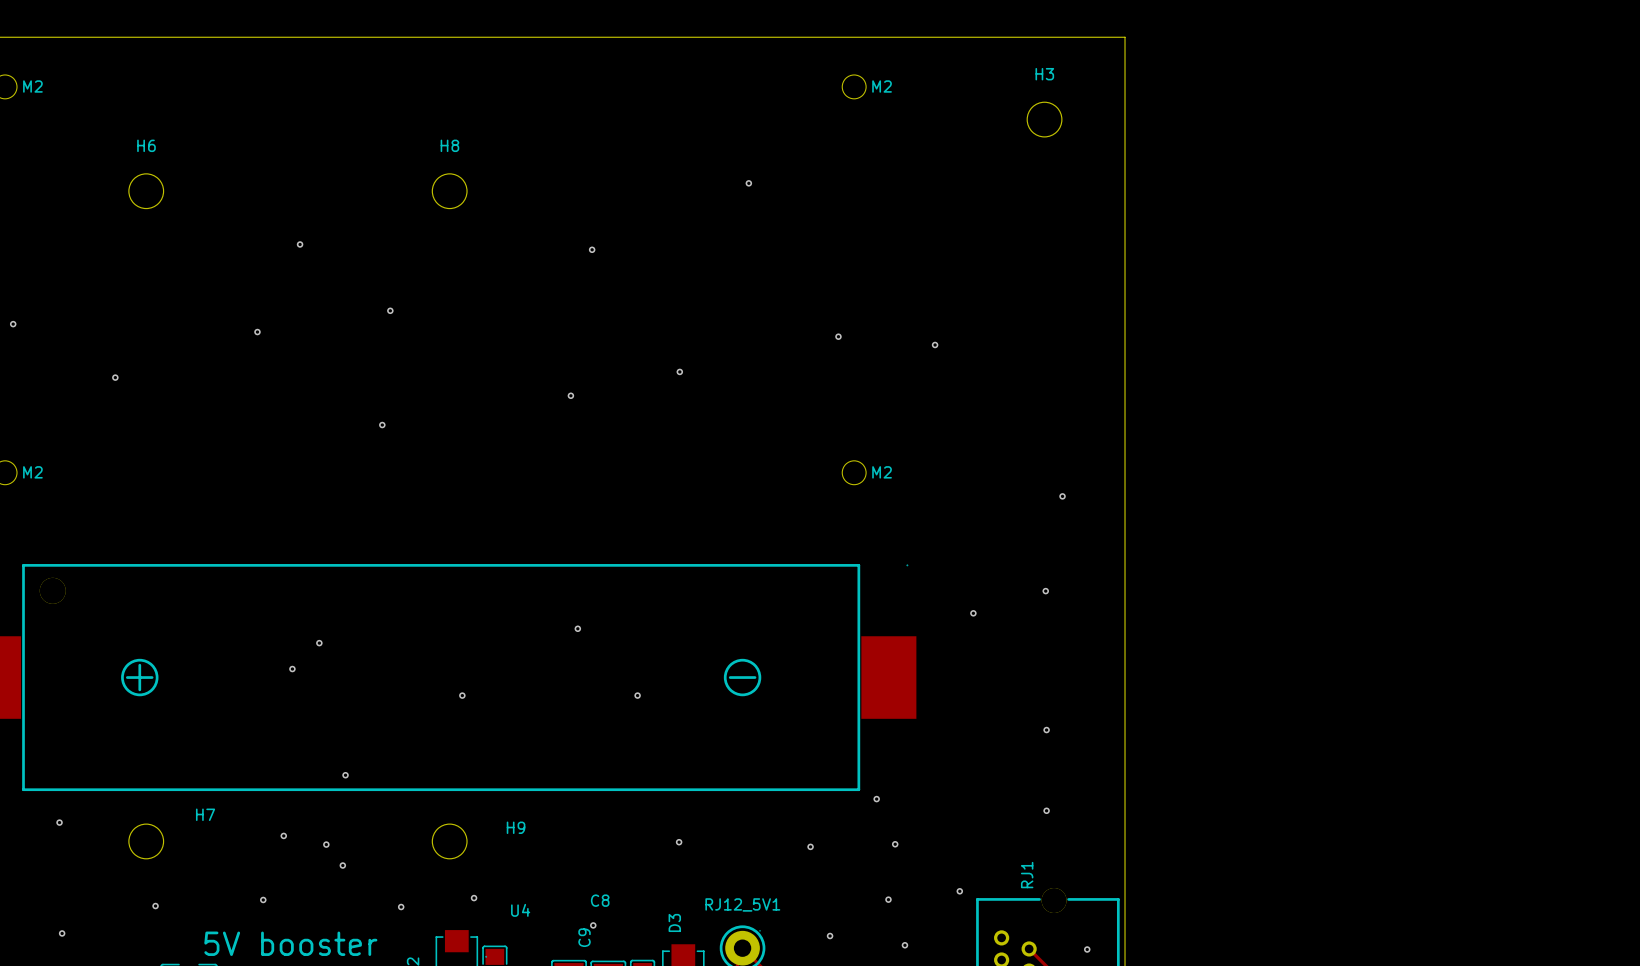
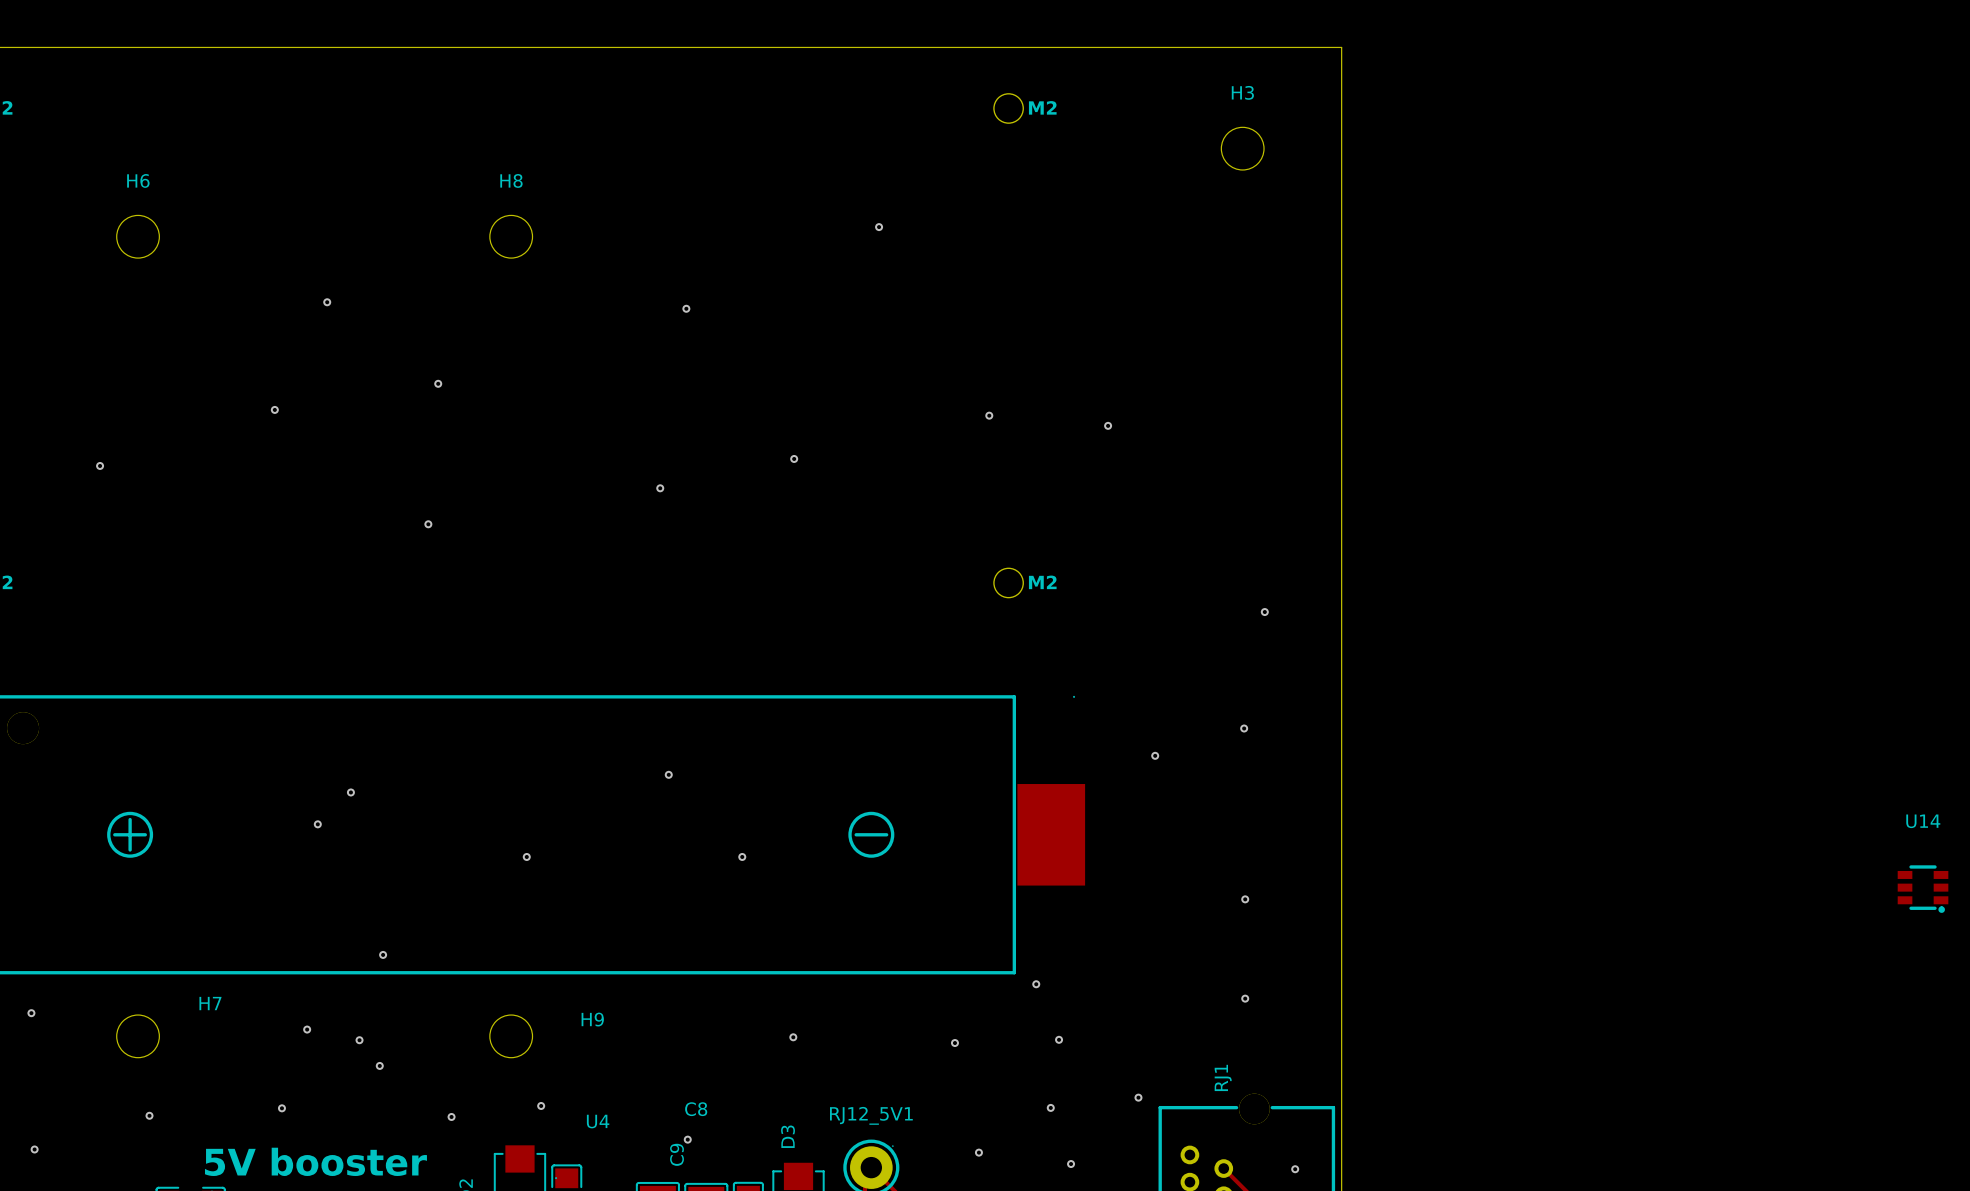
U14: none -> (1923, 889)

